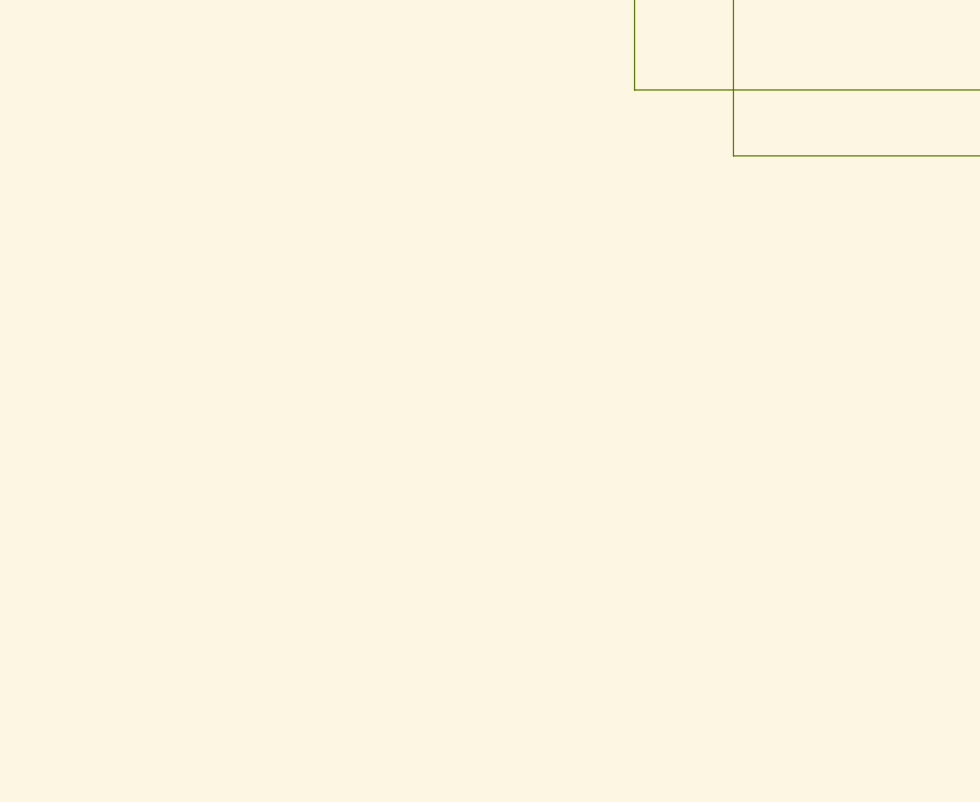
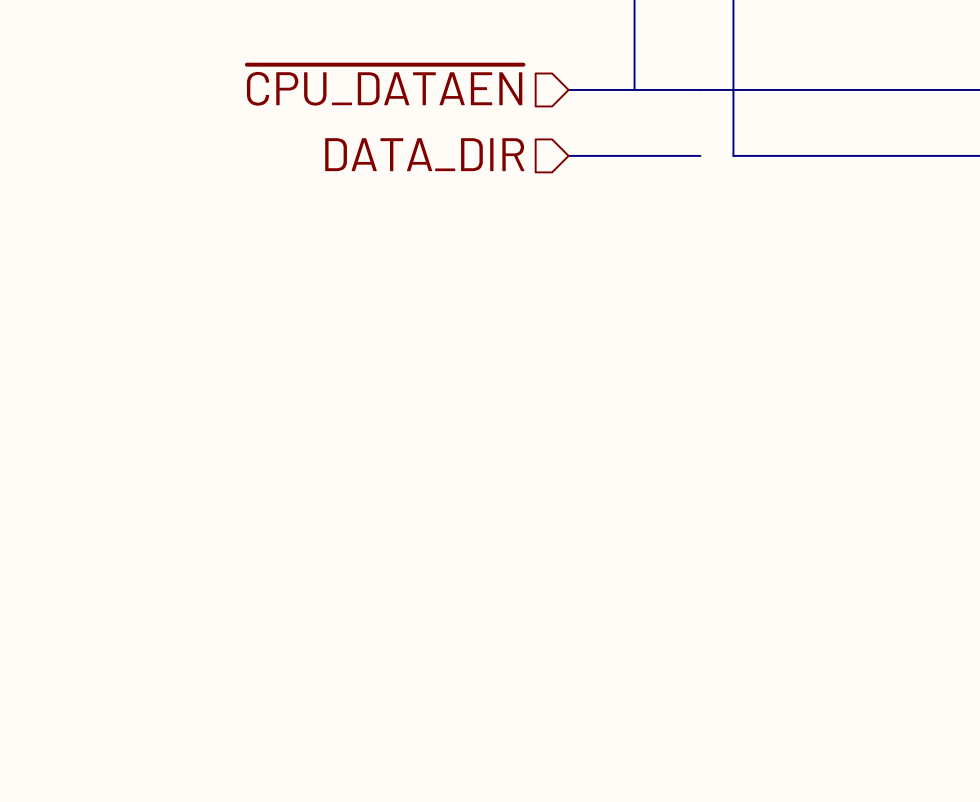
wire: none -> (568, 89) (634, 89)
hierarchical label: none -> ~{CPU_DATAEN} (385, 85)
wire: none -> (568, 155) (700, 155)
hierarchical label: none -> DATA_DIR (424, 154)

